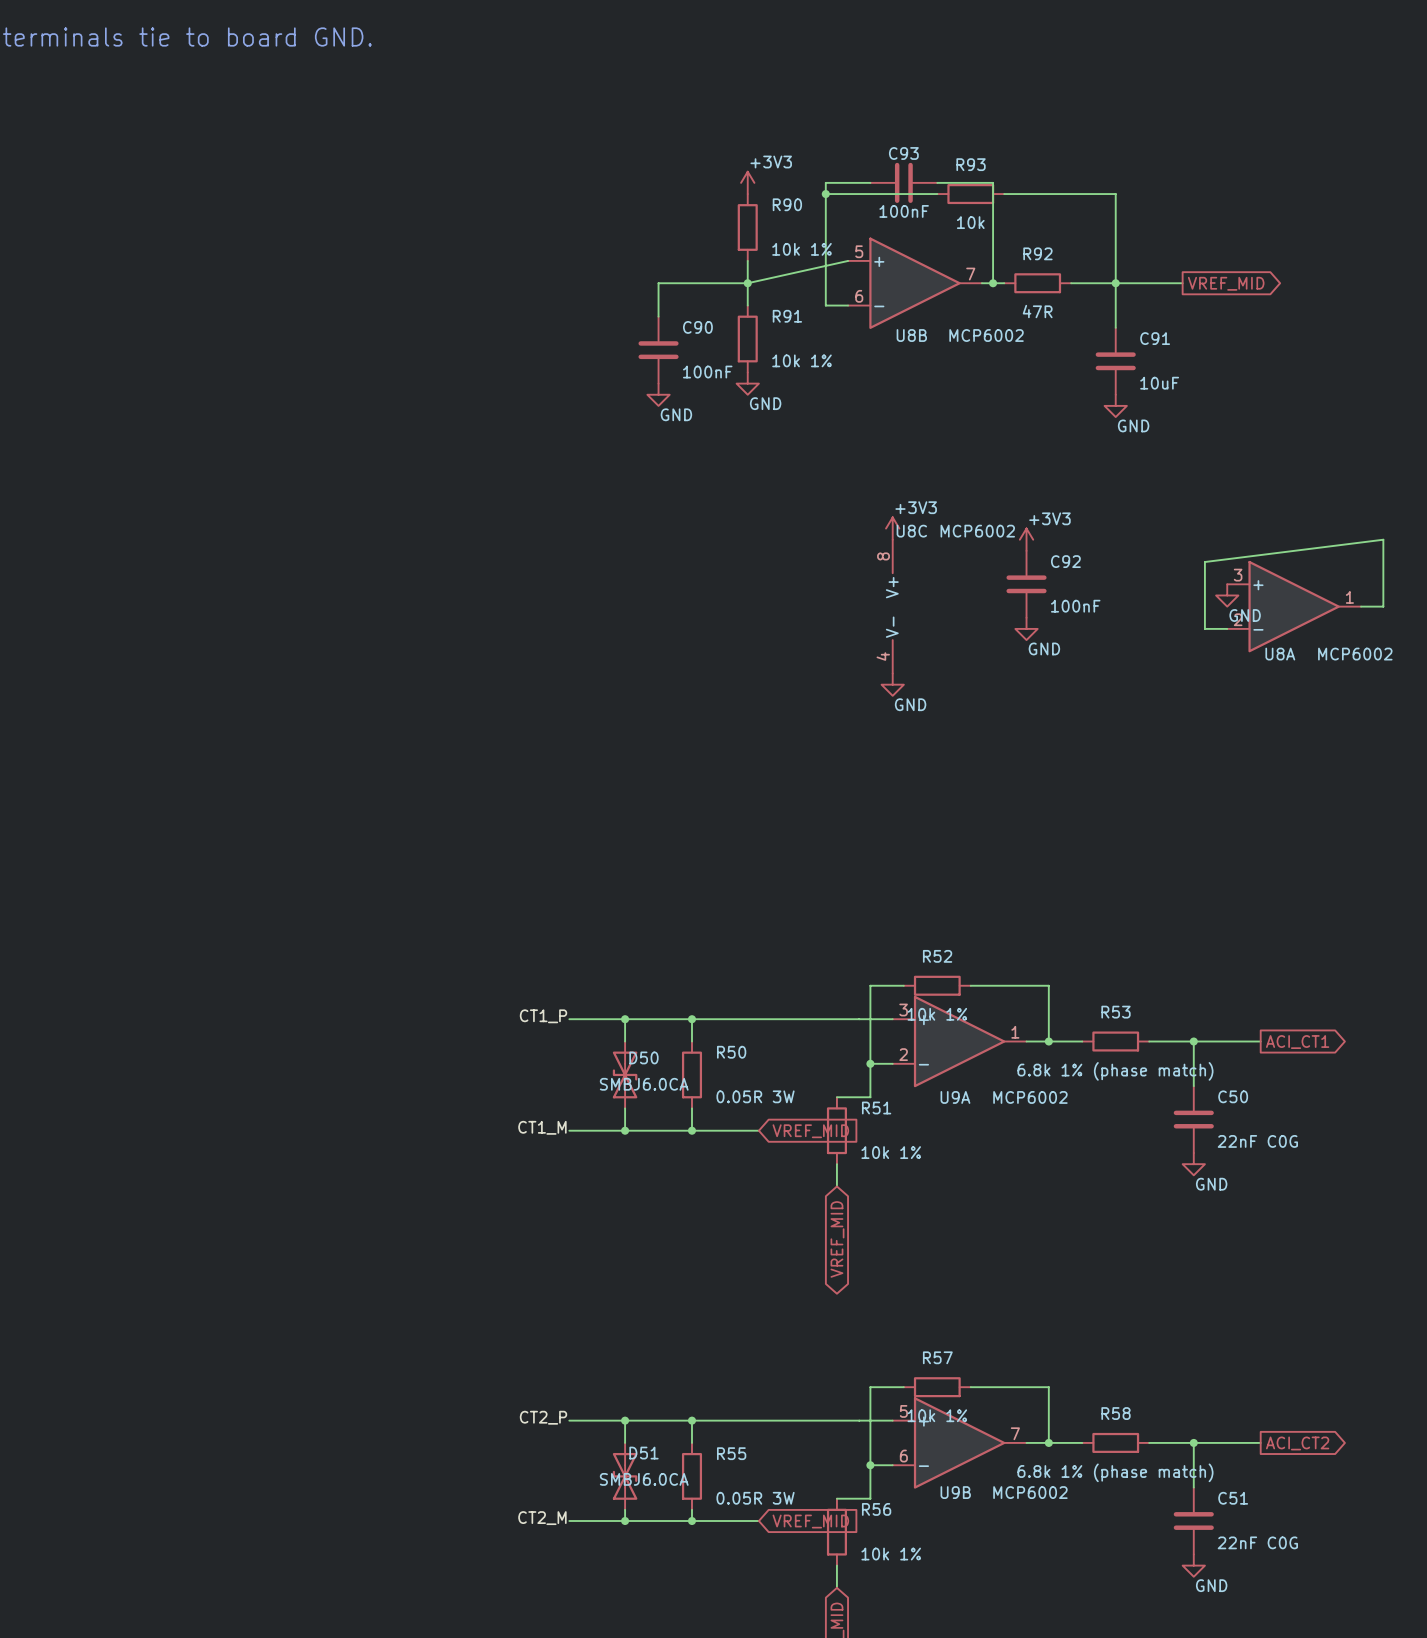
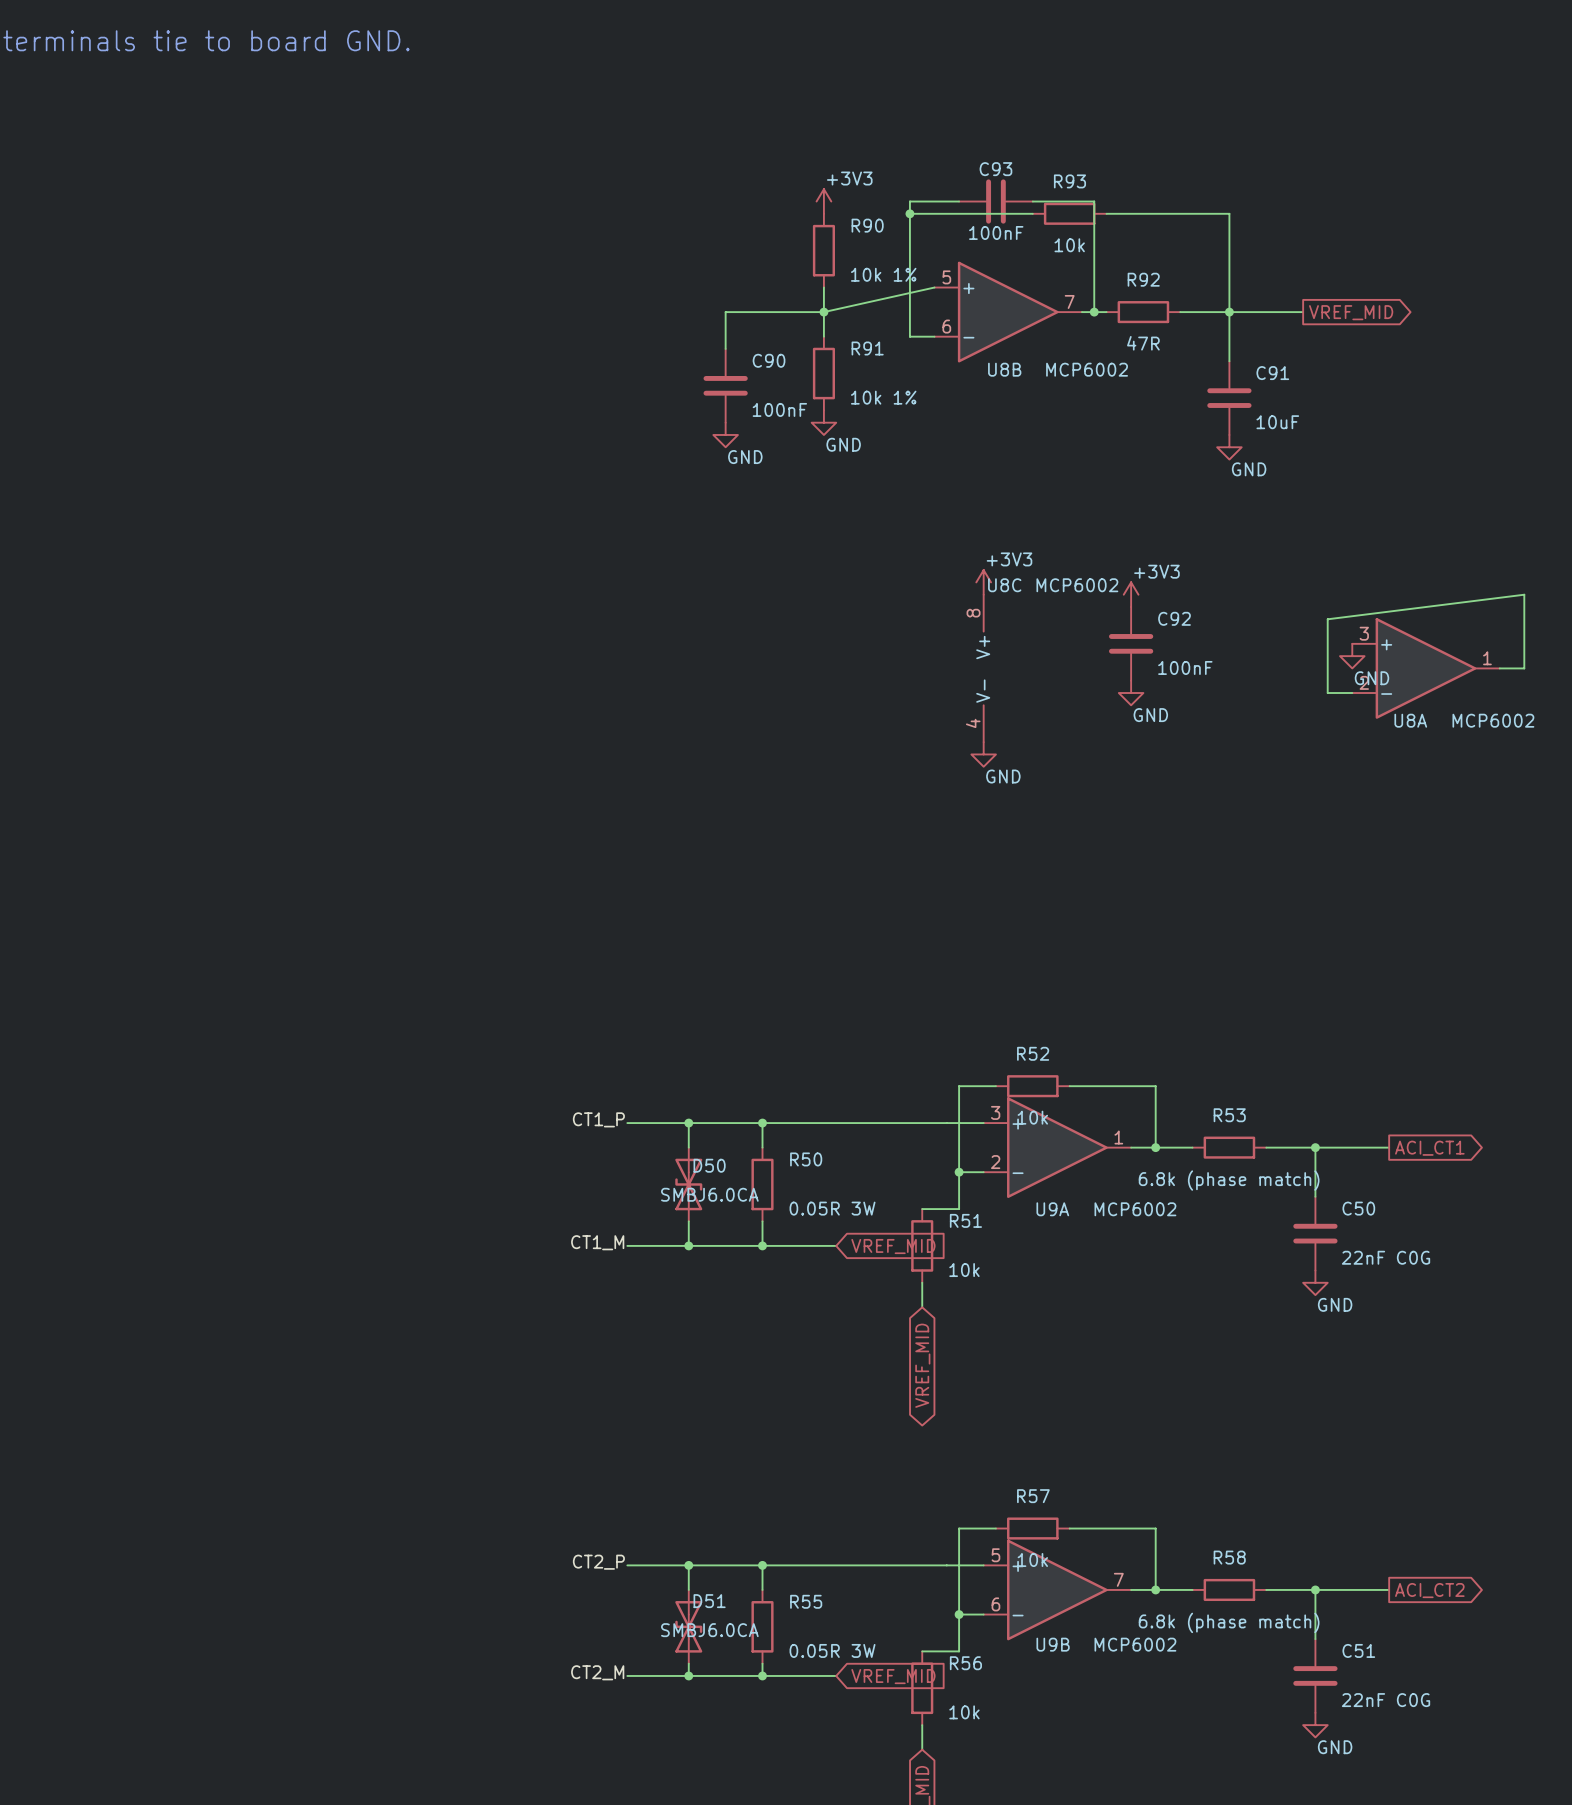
R52 value: 10k 1% (937, 1014) -> 10k (1032, 1117)
R53 value: 6.8k 1% (phase match) (1115, 1071) -> 6.8k (phase match) (1229, 1180)
R51 value: 10k 1% (891, 1152) -> 10k (964, 1270)
R57 value: 10k 1% (937, 1415) -> 10k (1032, 1560)
R58 value: 6.8k 1% (phase match) (1115, 1472) -> 6.8k (phase match) (1229, 1622)
R56 value: 10k 1% (891, 1554) -> 10k (964, 1712)

